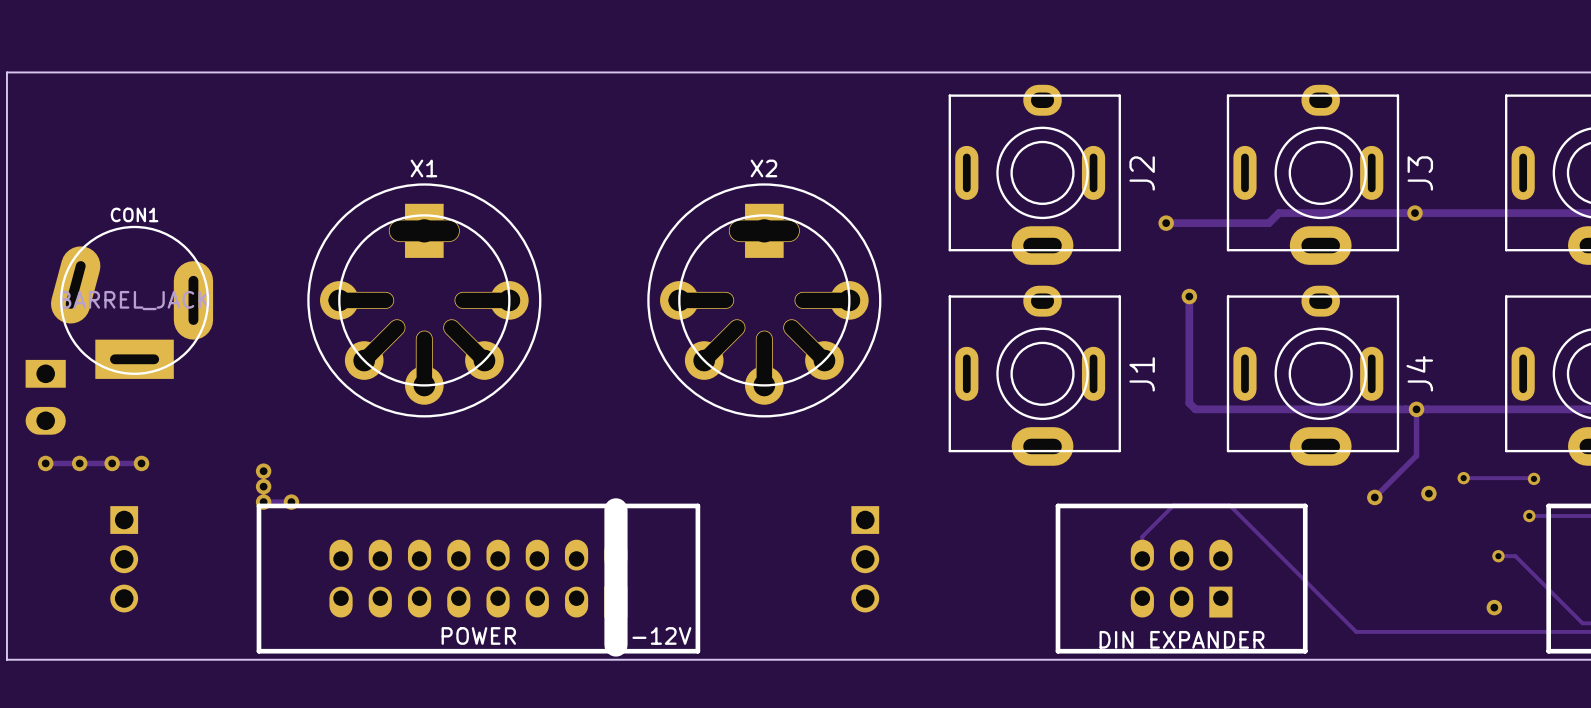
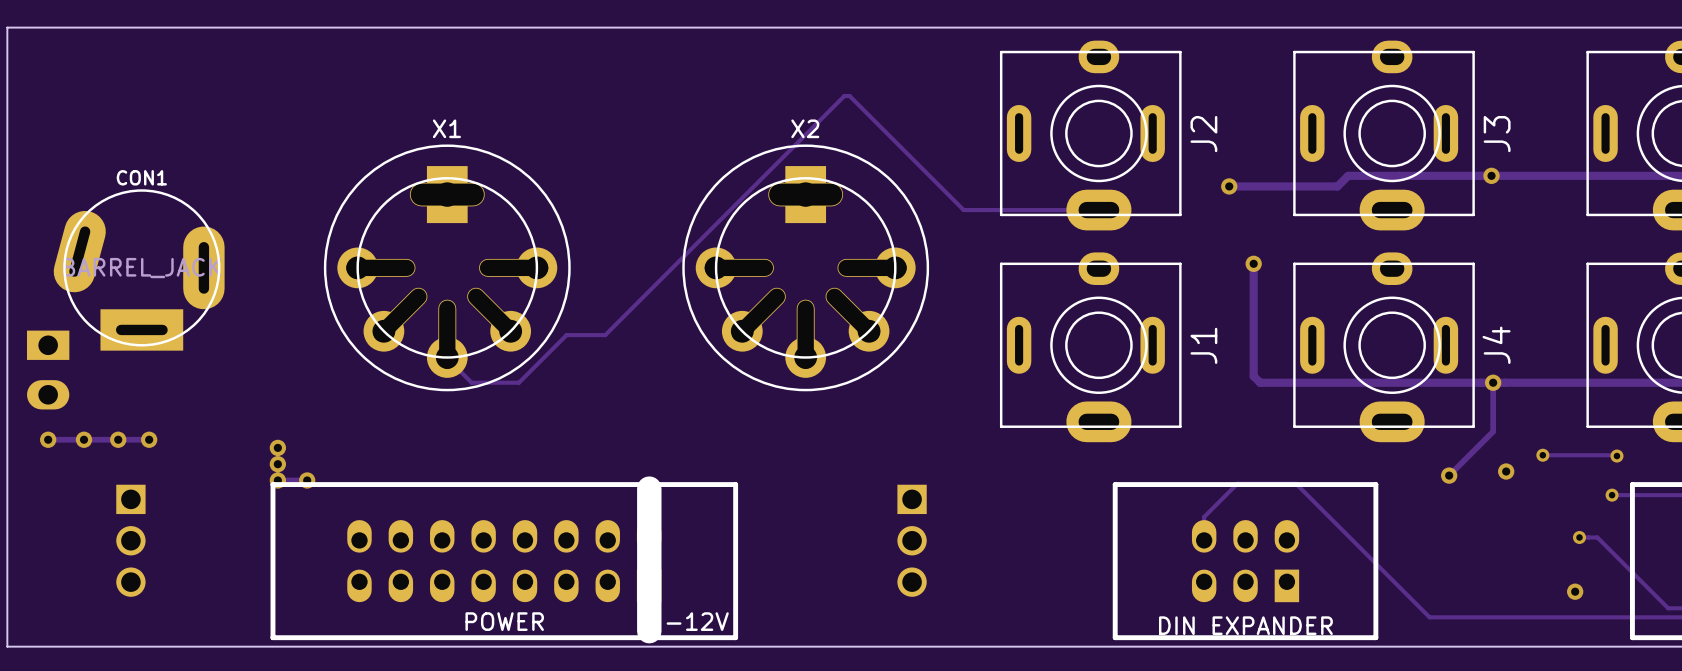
track: none -> (1098, 210) (963, 210) (849, 96) (844, 96) (605, 335) (566, 335) (518, 382) (471, 382) (459, 370)

